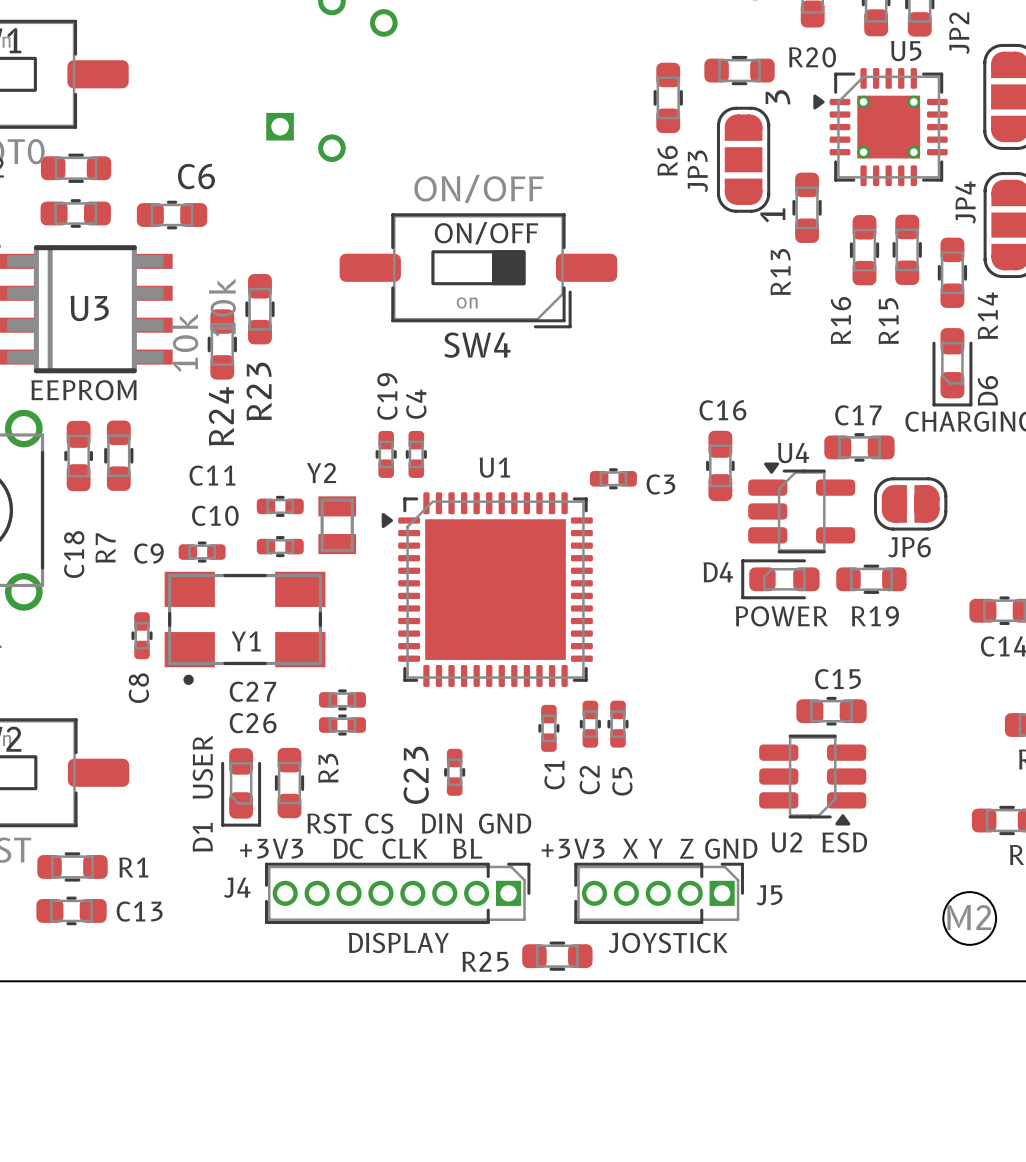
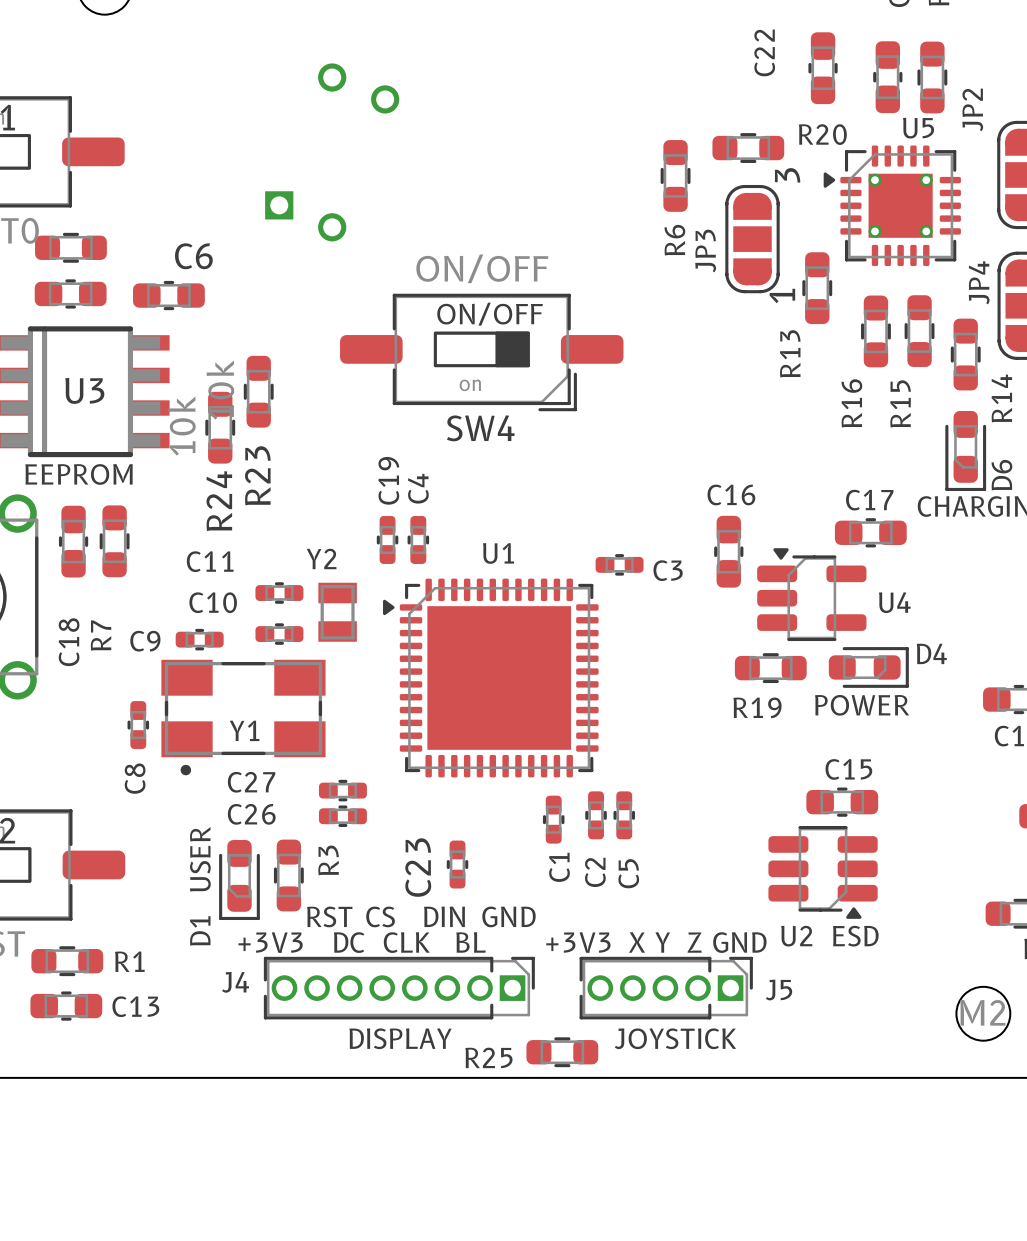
U4 name position: U4 (793, 453) -> U4 (894, 602)
JP6: (910, 503) -> none
D4 rotation: 0° (780, 579) -> 180° (868, 667)
D4 position: (780, 579) -> (868, 667)
R19 position: (871, 579) -> (770, 668)
text position: POWER (781, 616) -> POWER (862, 705)
R19 name position: R19 (875, 616) -> R19 (757, 707)

